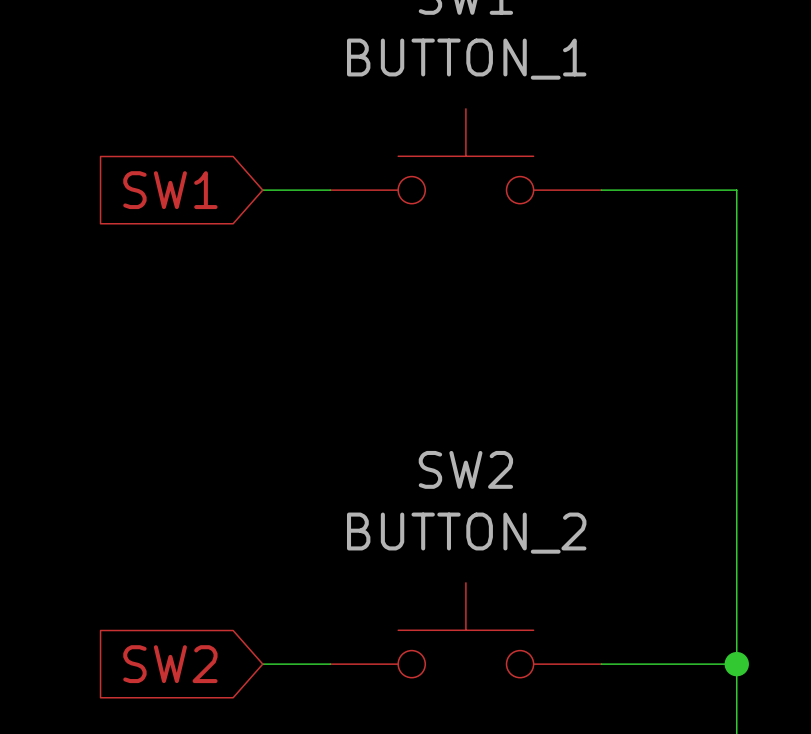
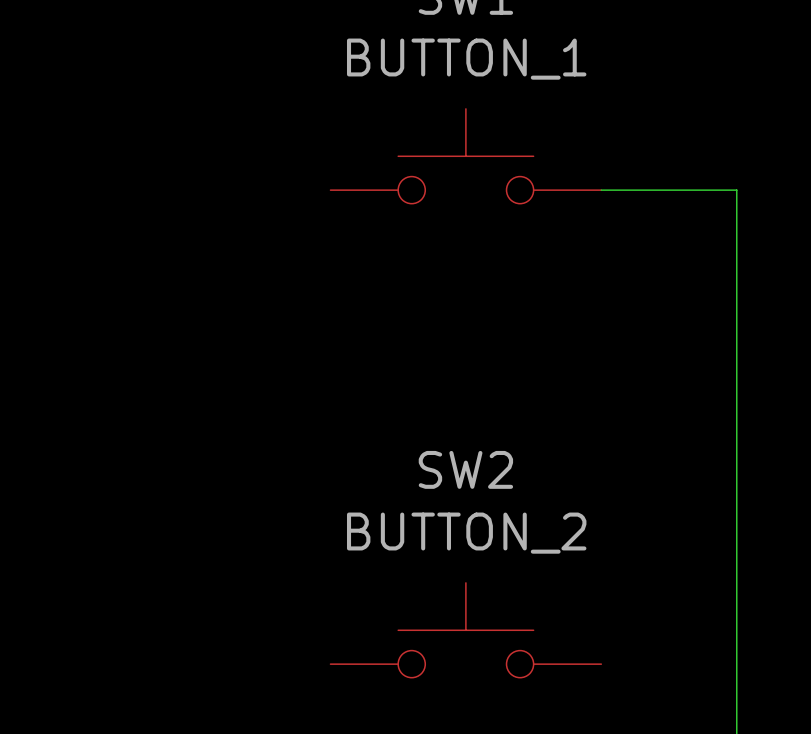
global label: SW1 (170, 190) -> none
wire: (262, 190) (330, 190) -> none
global label: SW2 (170, 664) -> none
wire: (262, 664) (330, 664) -> none
wire: (601, 664) (736, 664) -> none
junction: (736, 664) -> none

